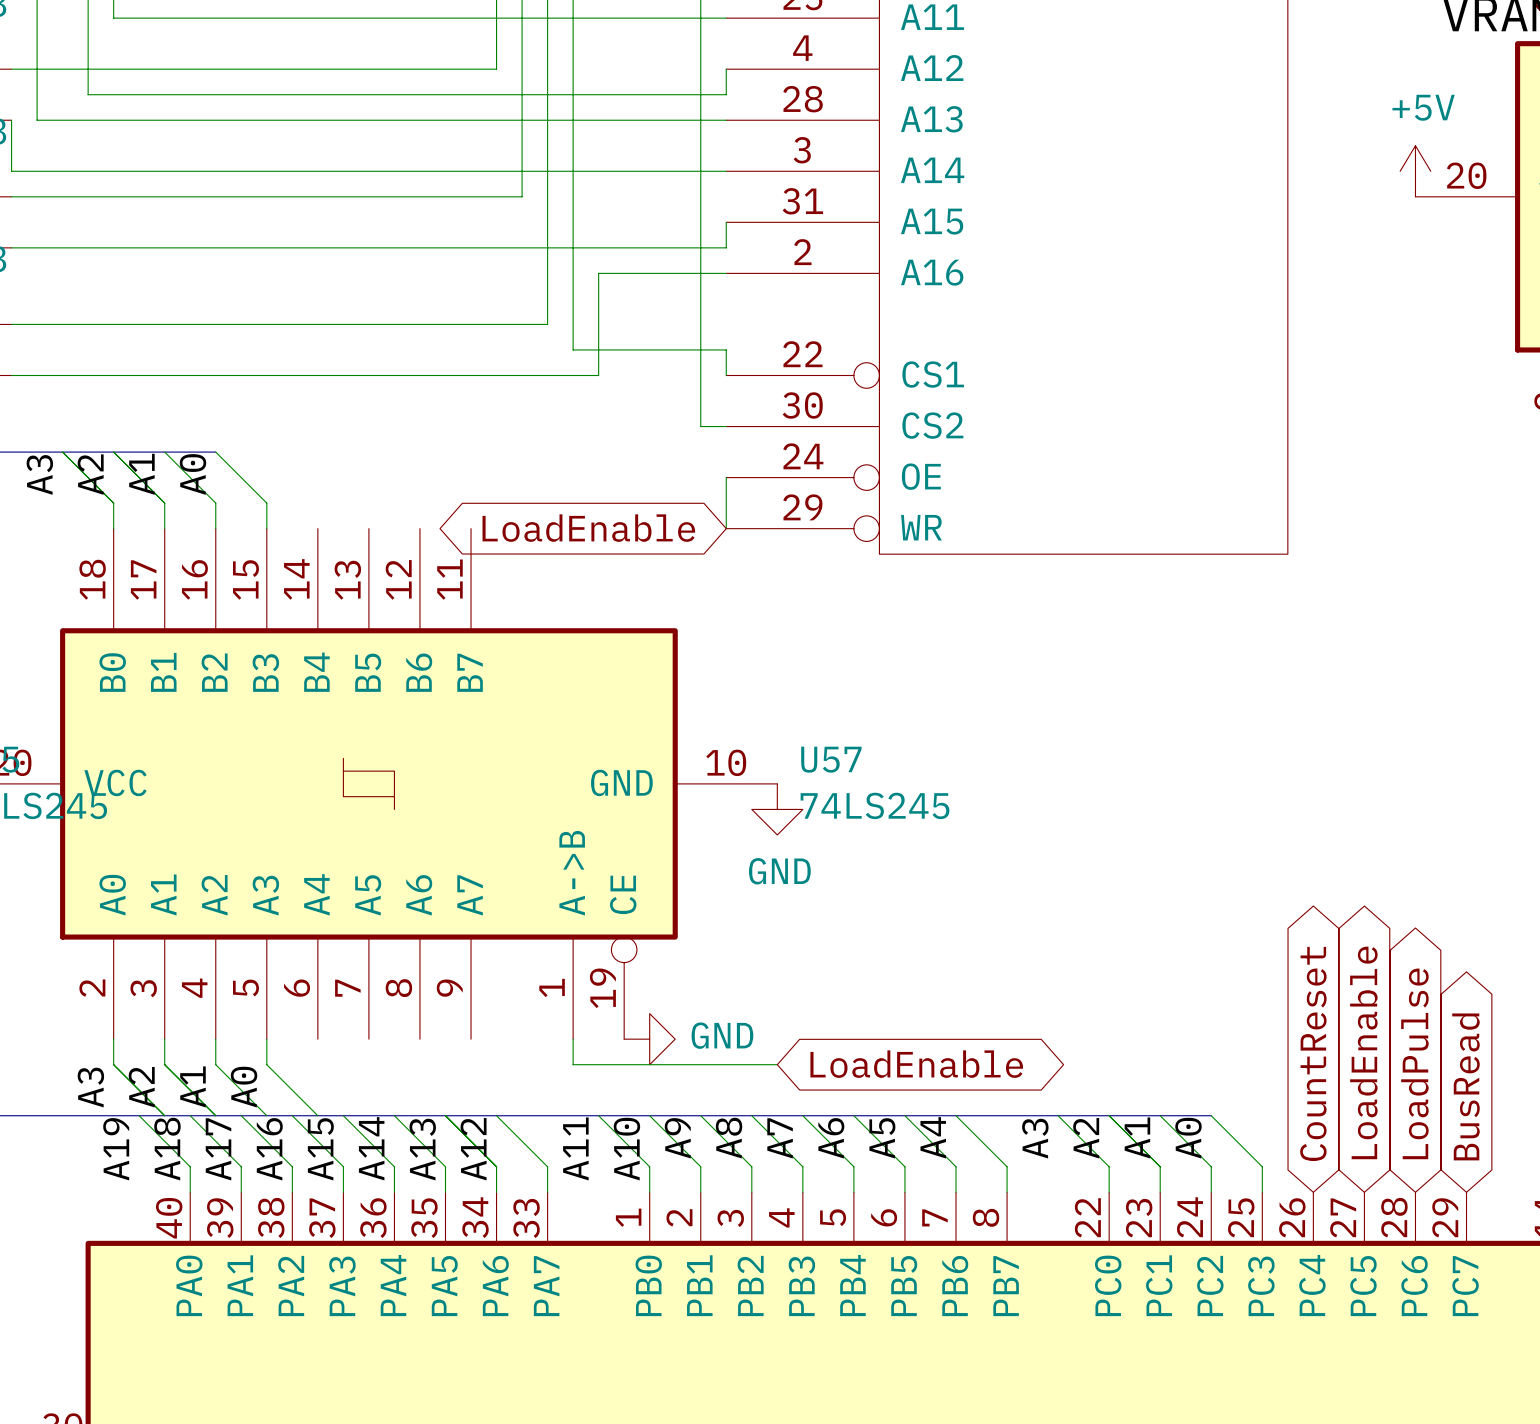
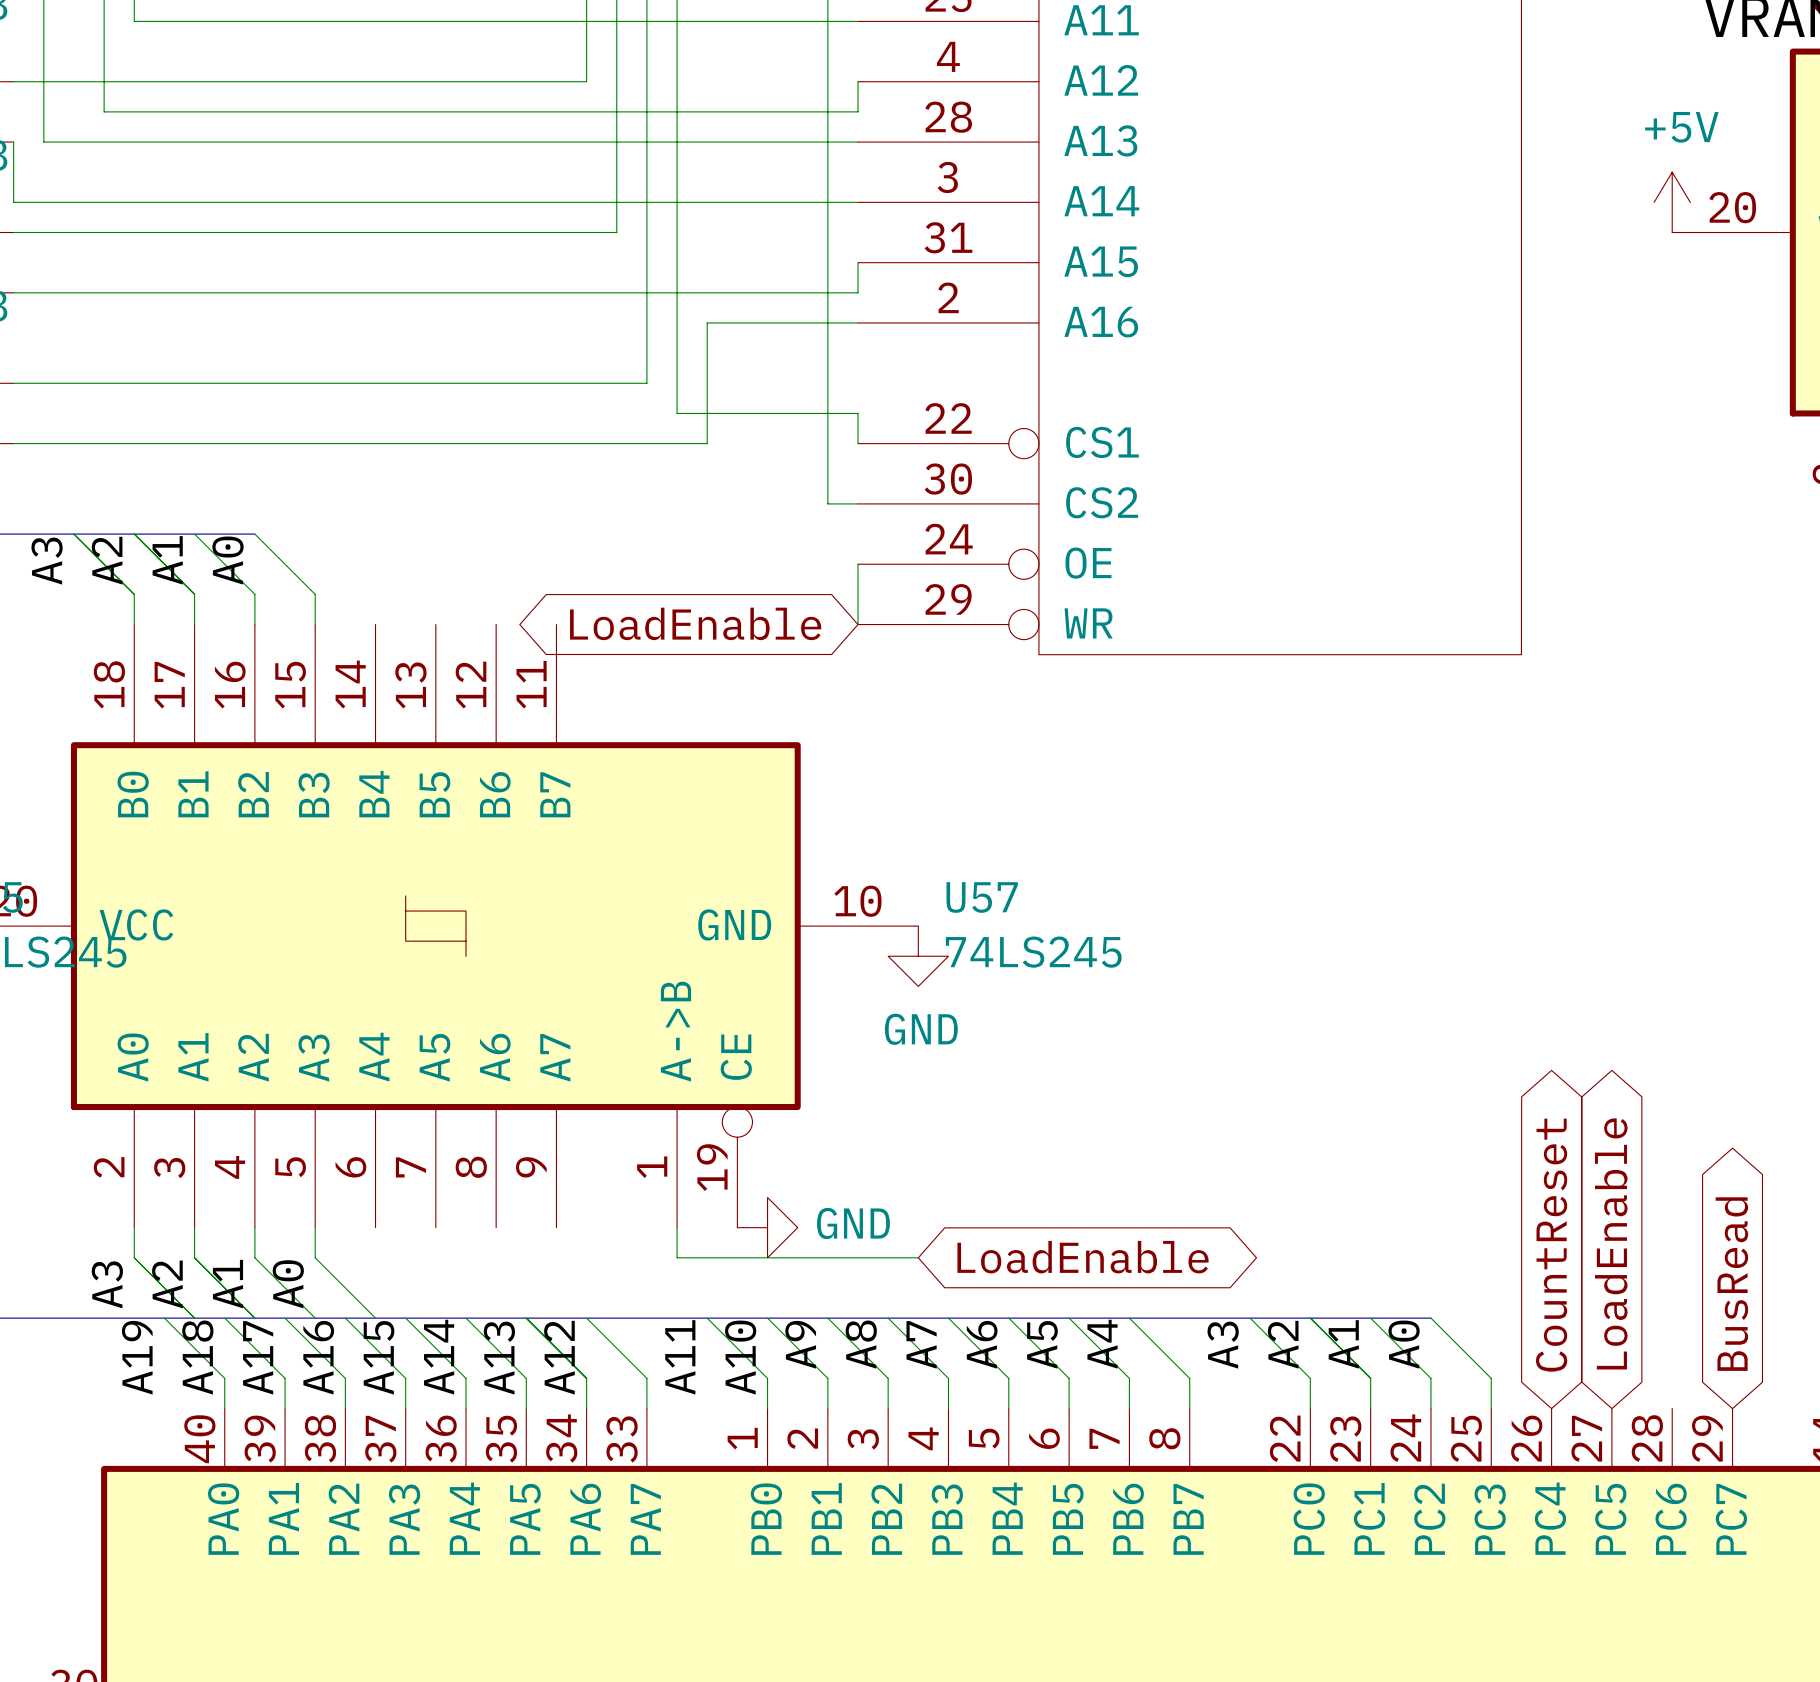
global label: LoadPulse (1414, 1063) -> none

